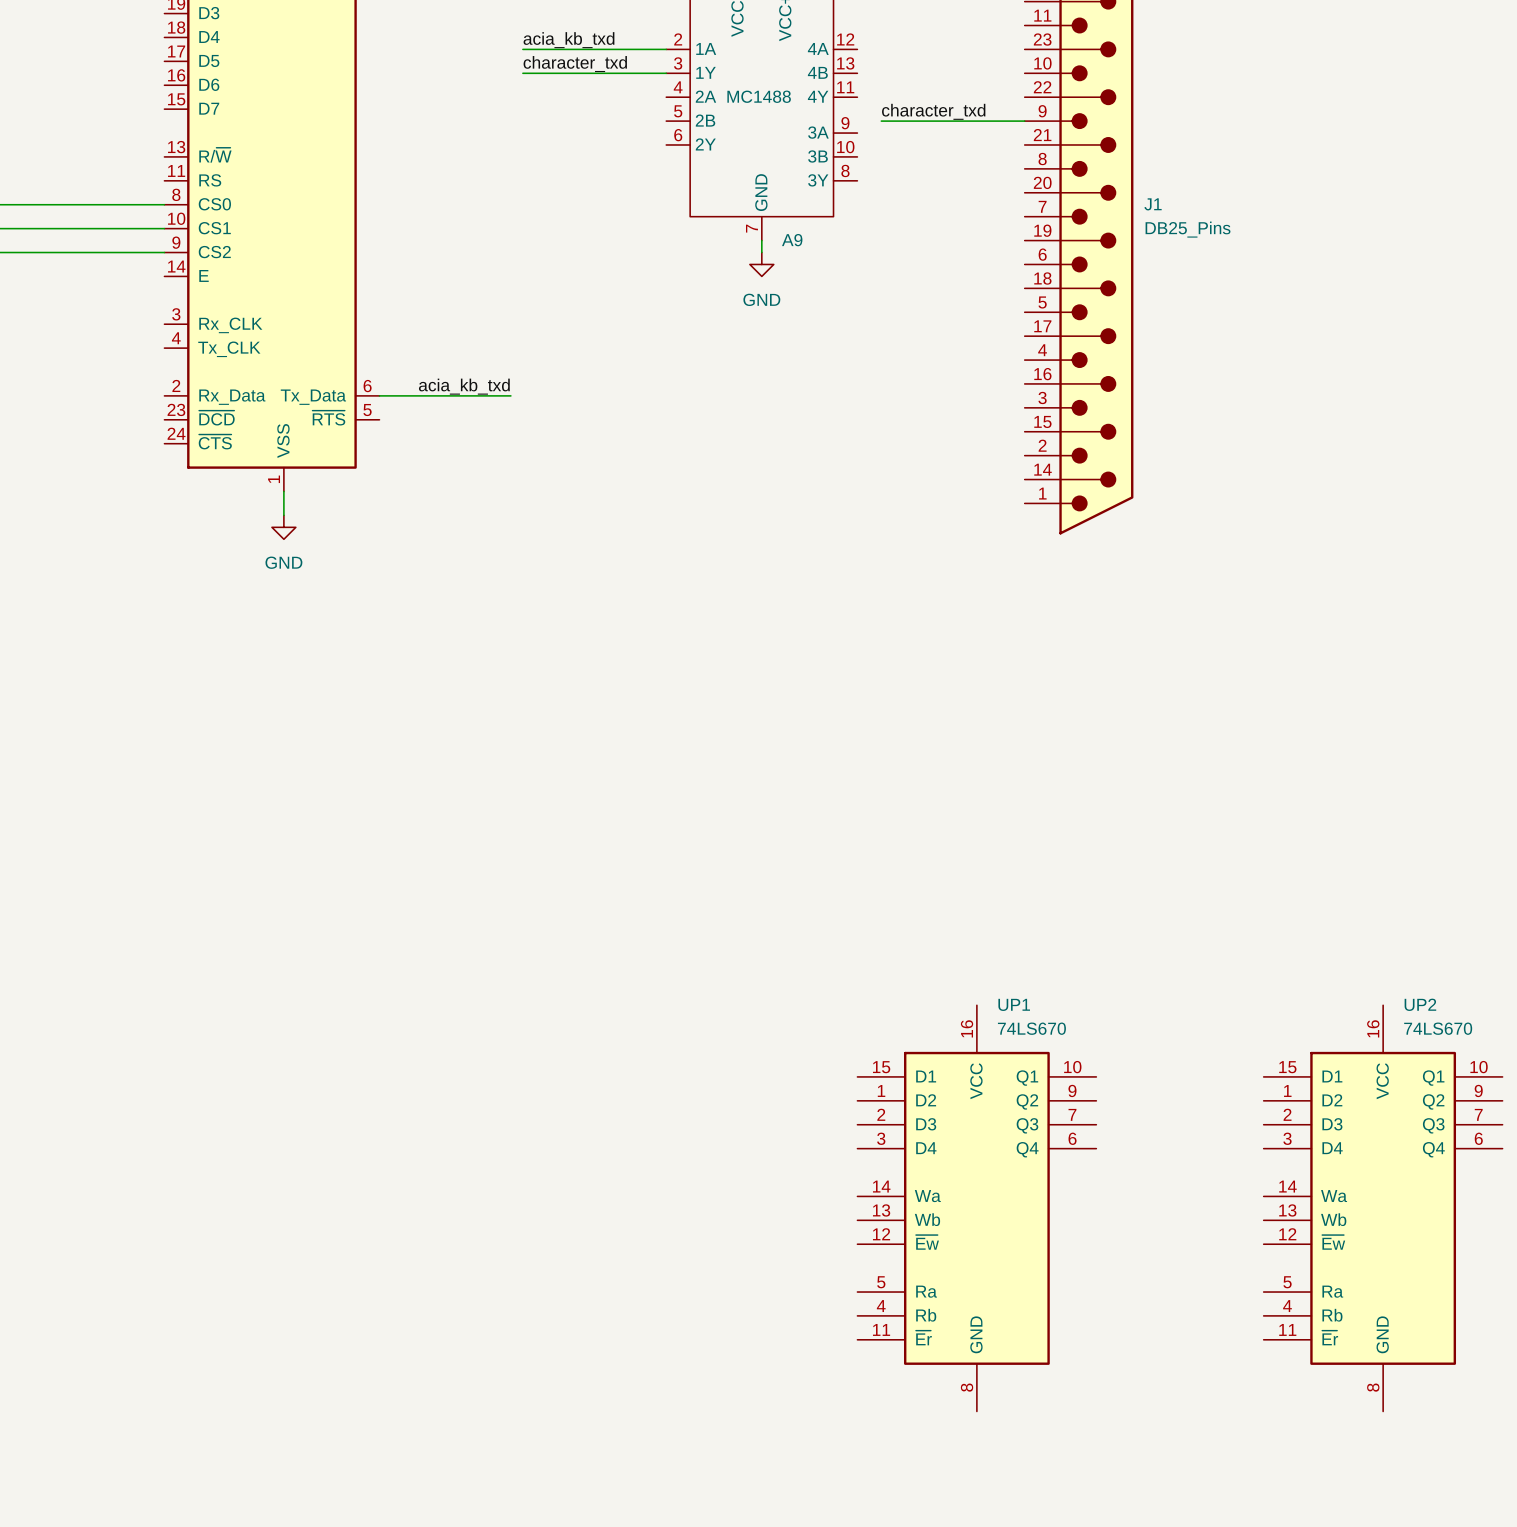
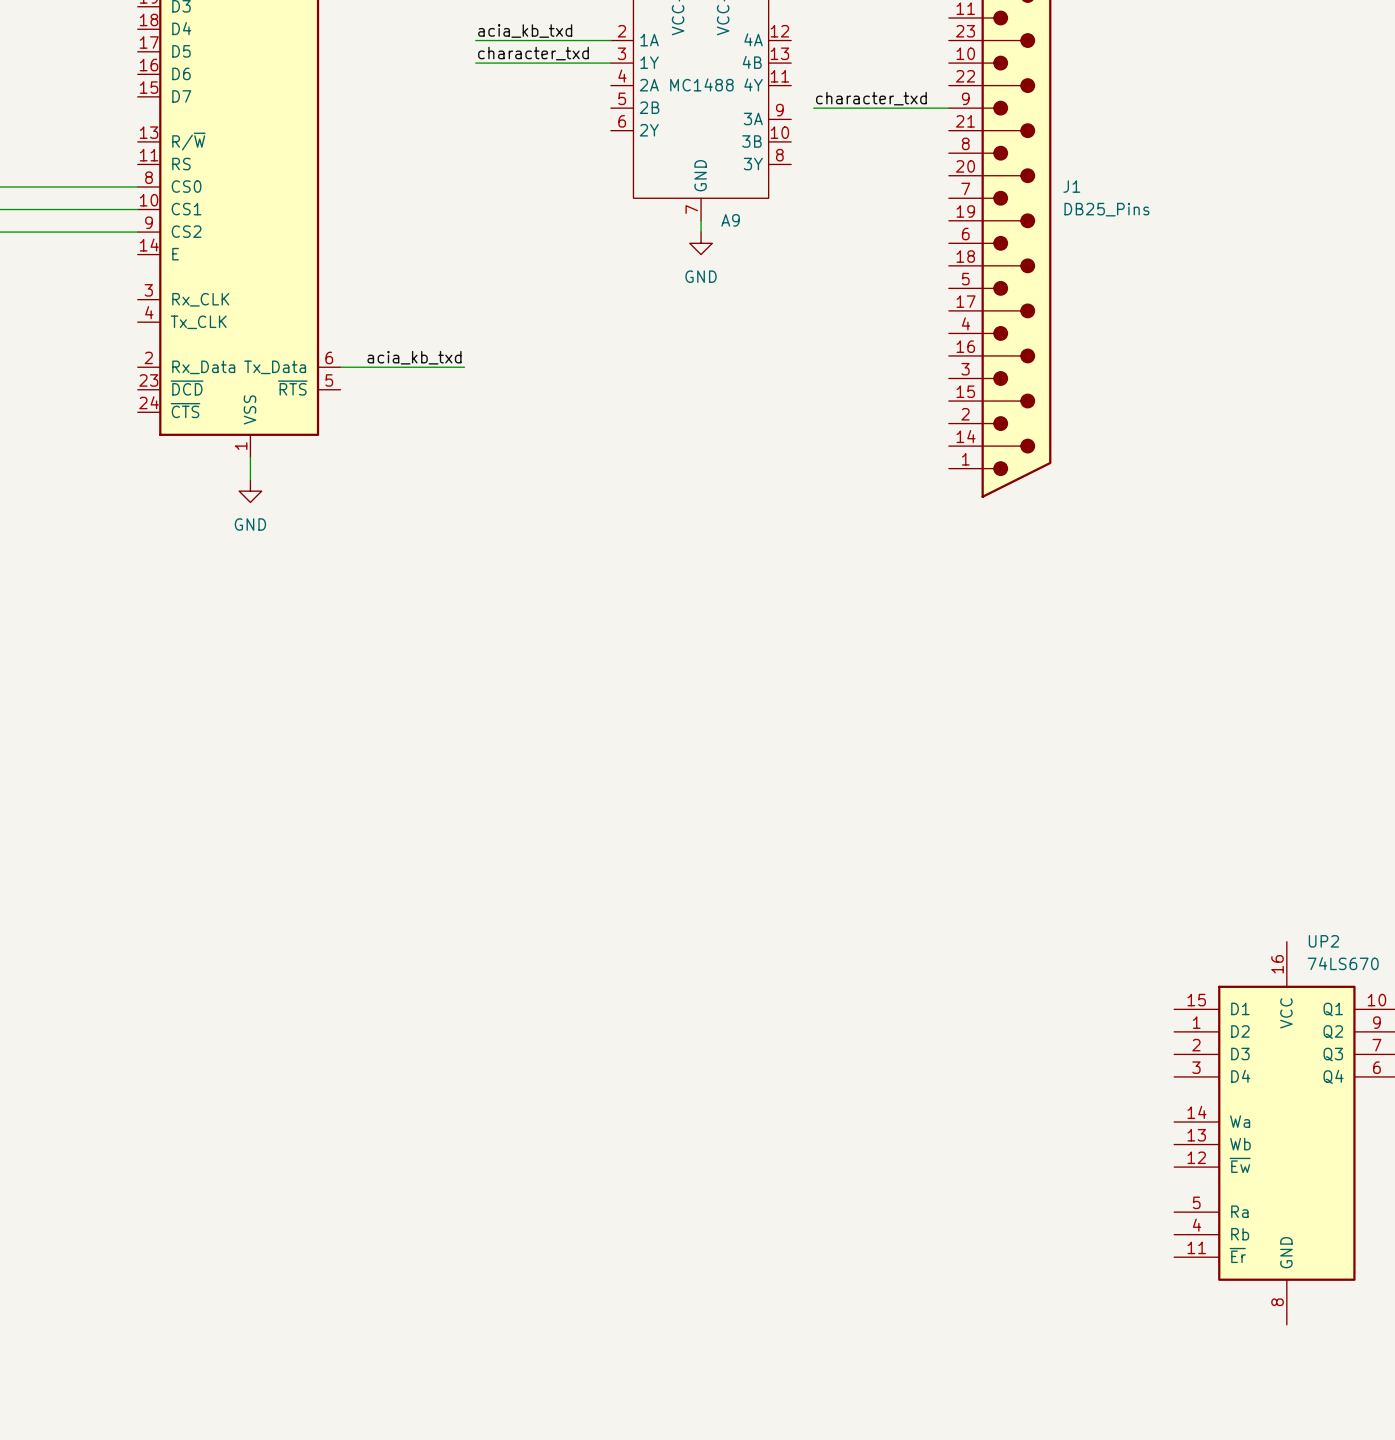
UP1: 74LS670 (976, 1208) -> none

